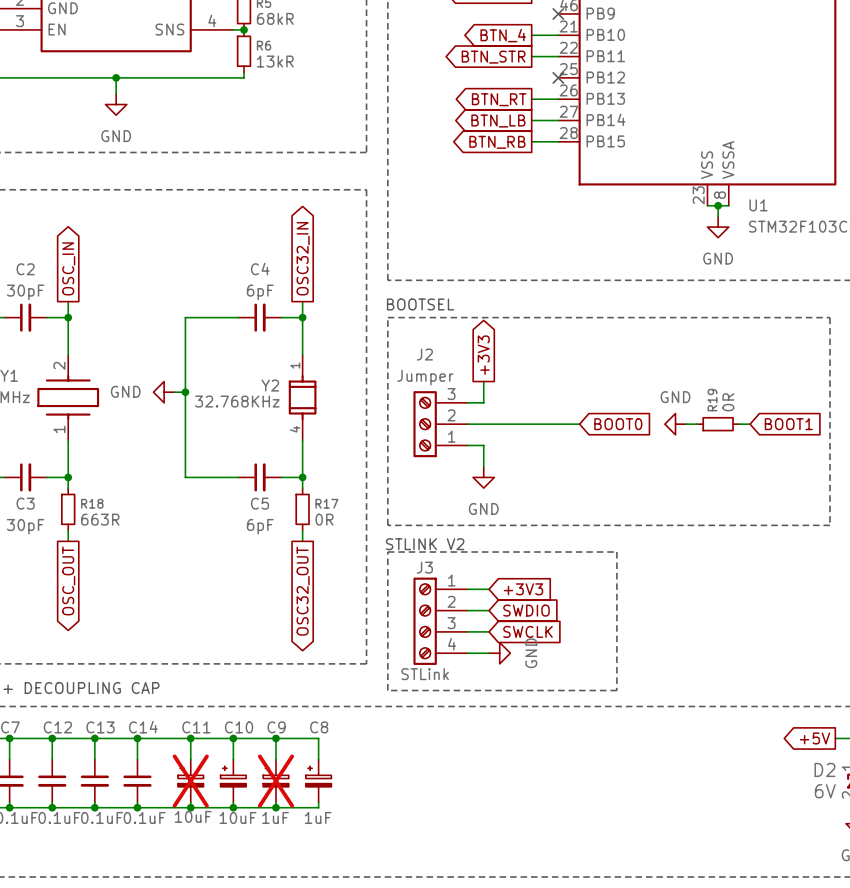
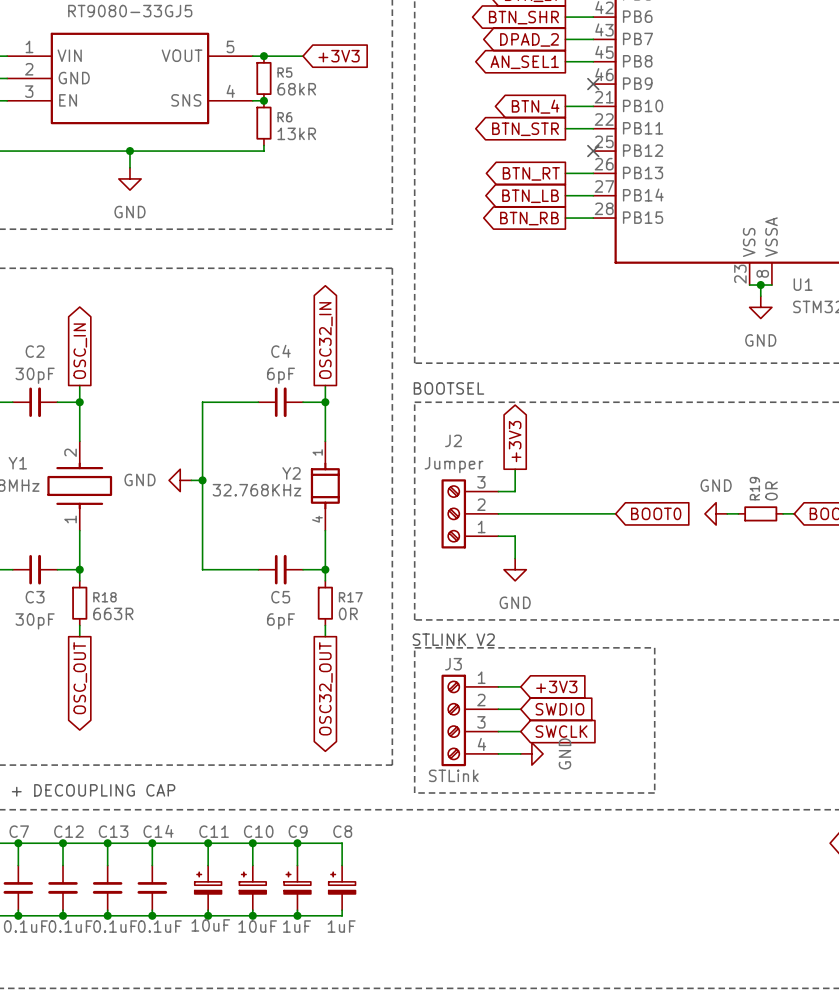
C11 do-not-place cross: (190, 781) -> none
C9 do-not-place cross: (275, 781) -> none

